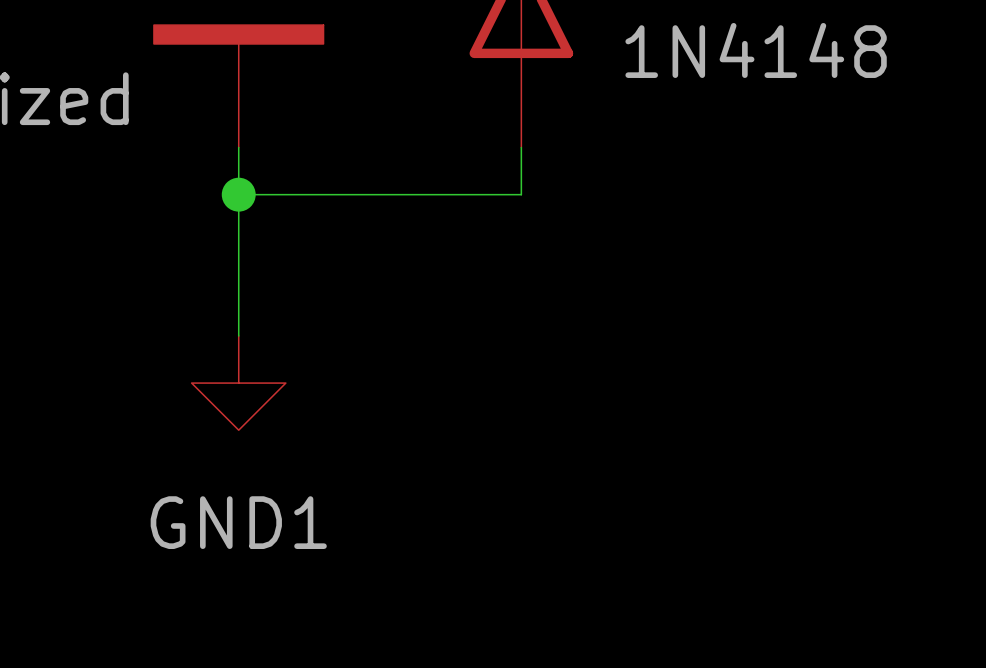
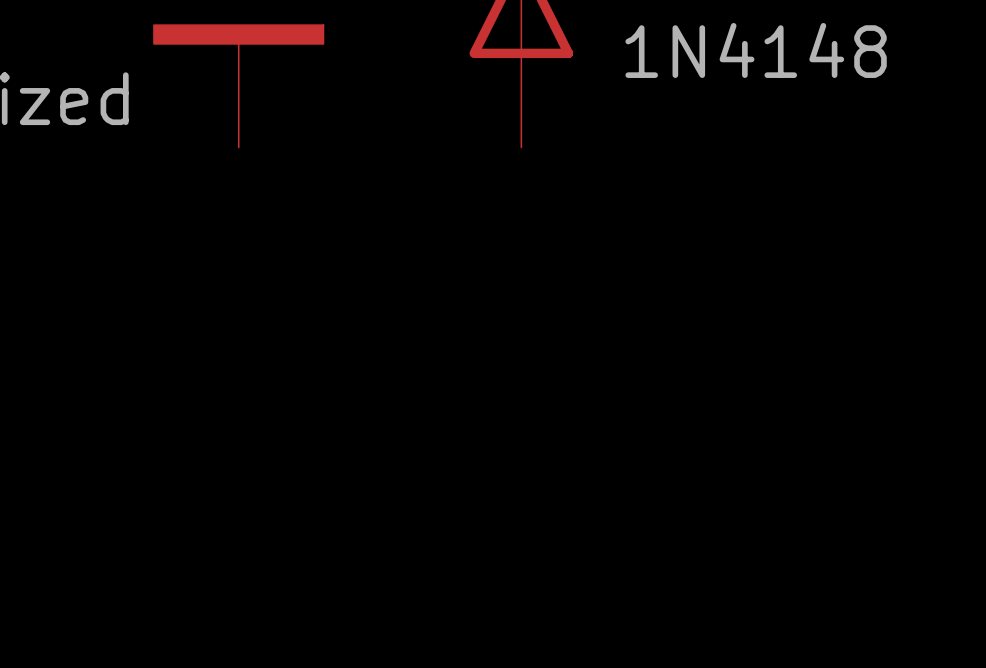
wire: (238, 147) (238, 335) -> none
wire: (521, 147) (521, 194) (238, 194) -> none
junction: (238, 194) -> none
power symbol: GND1 (238, 383) -> none

